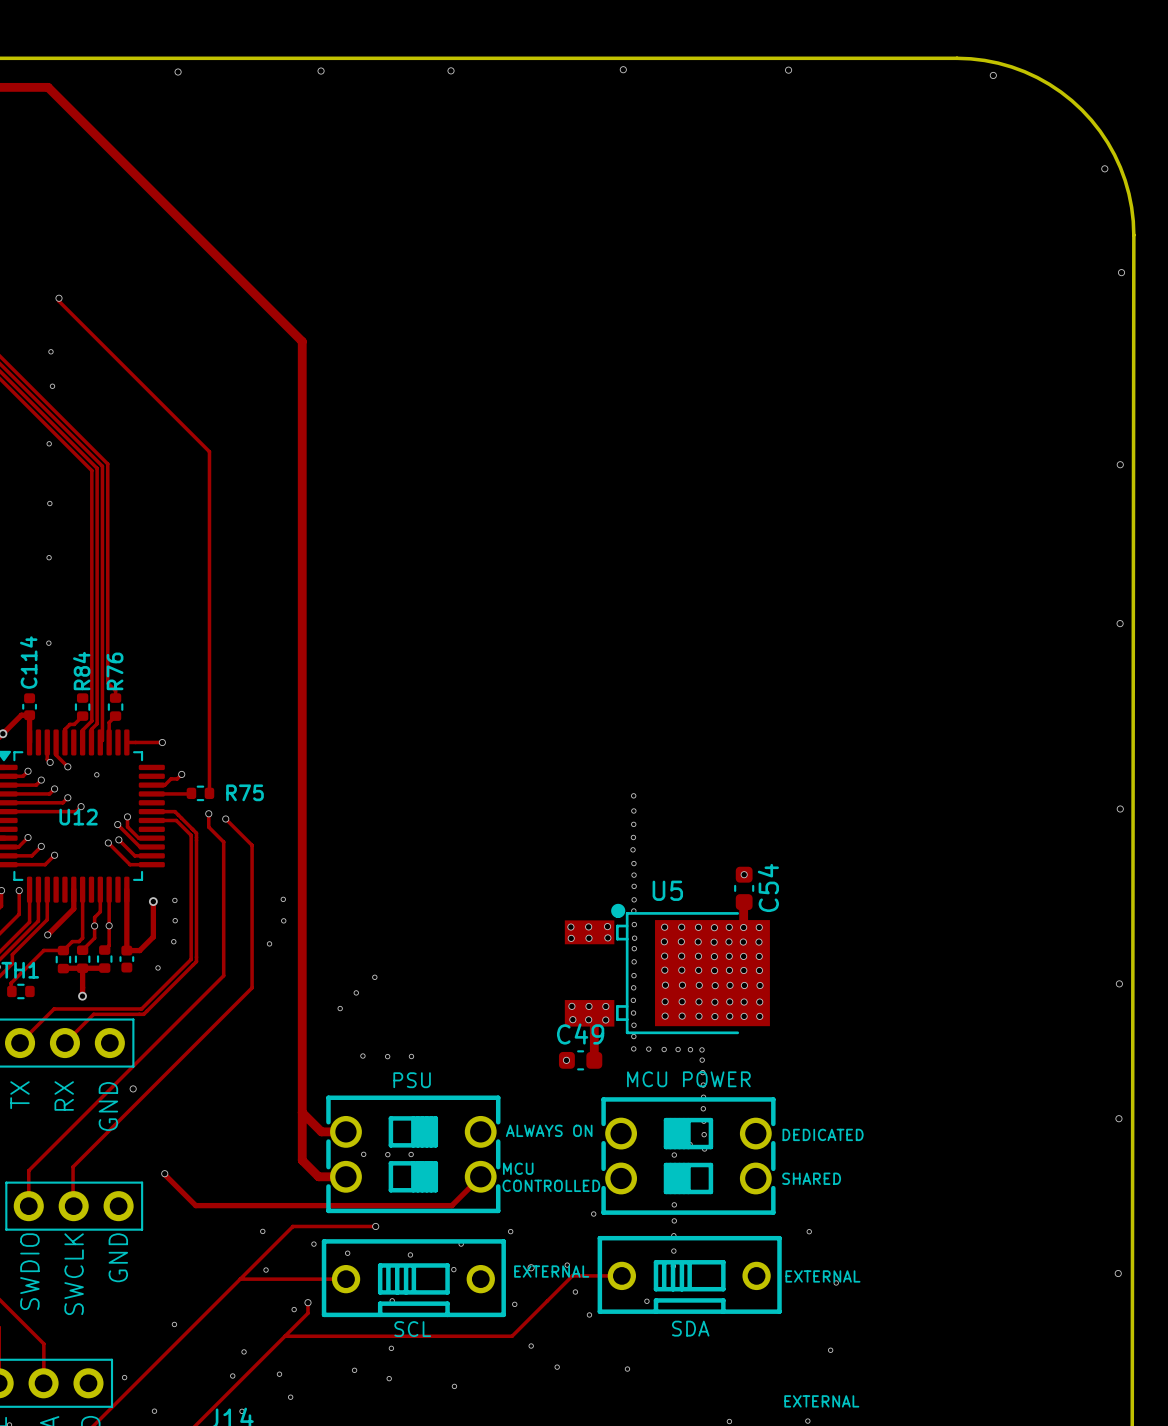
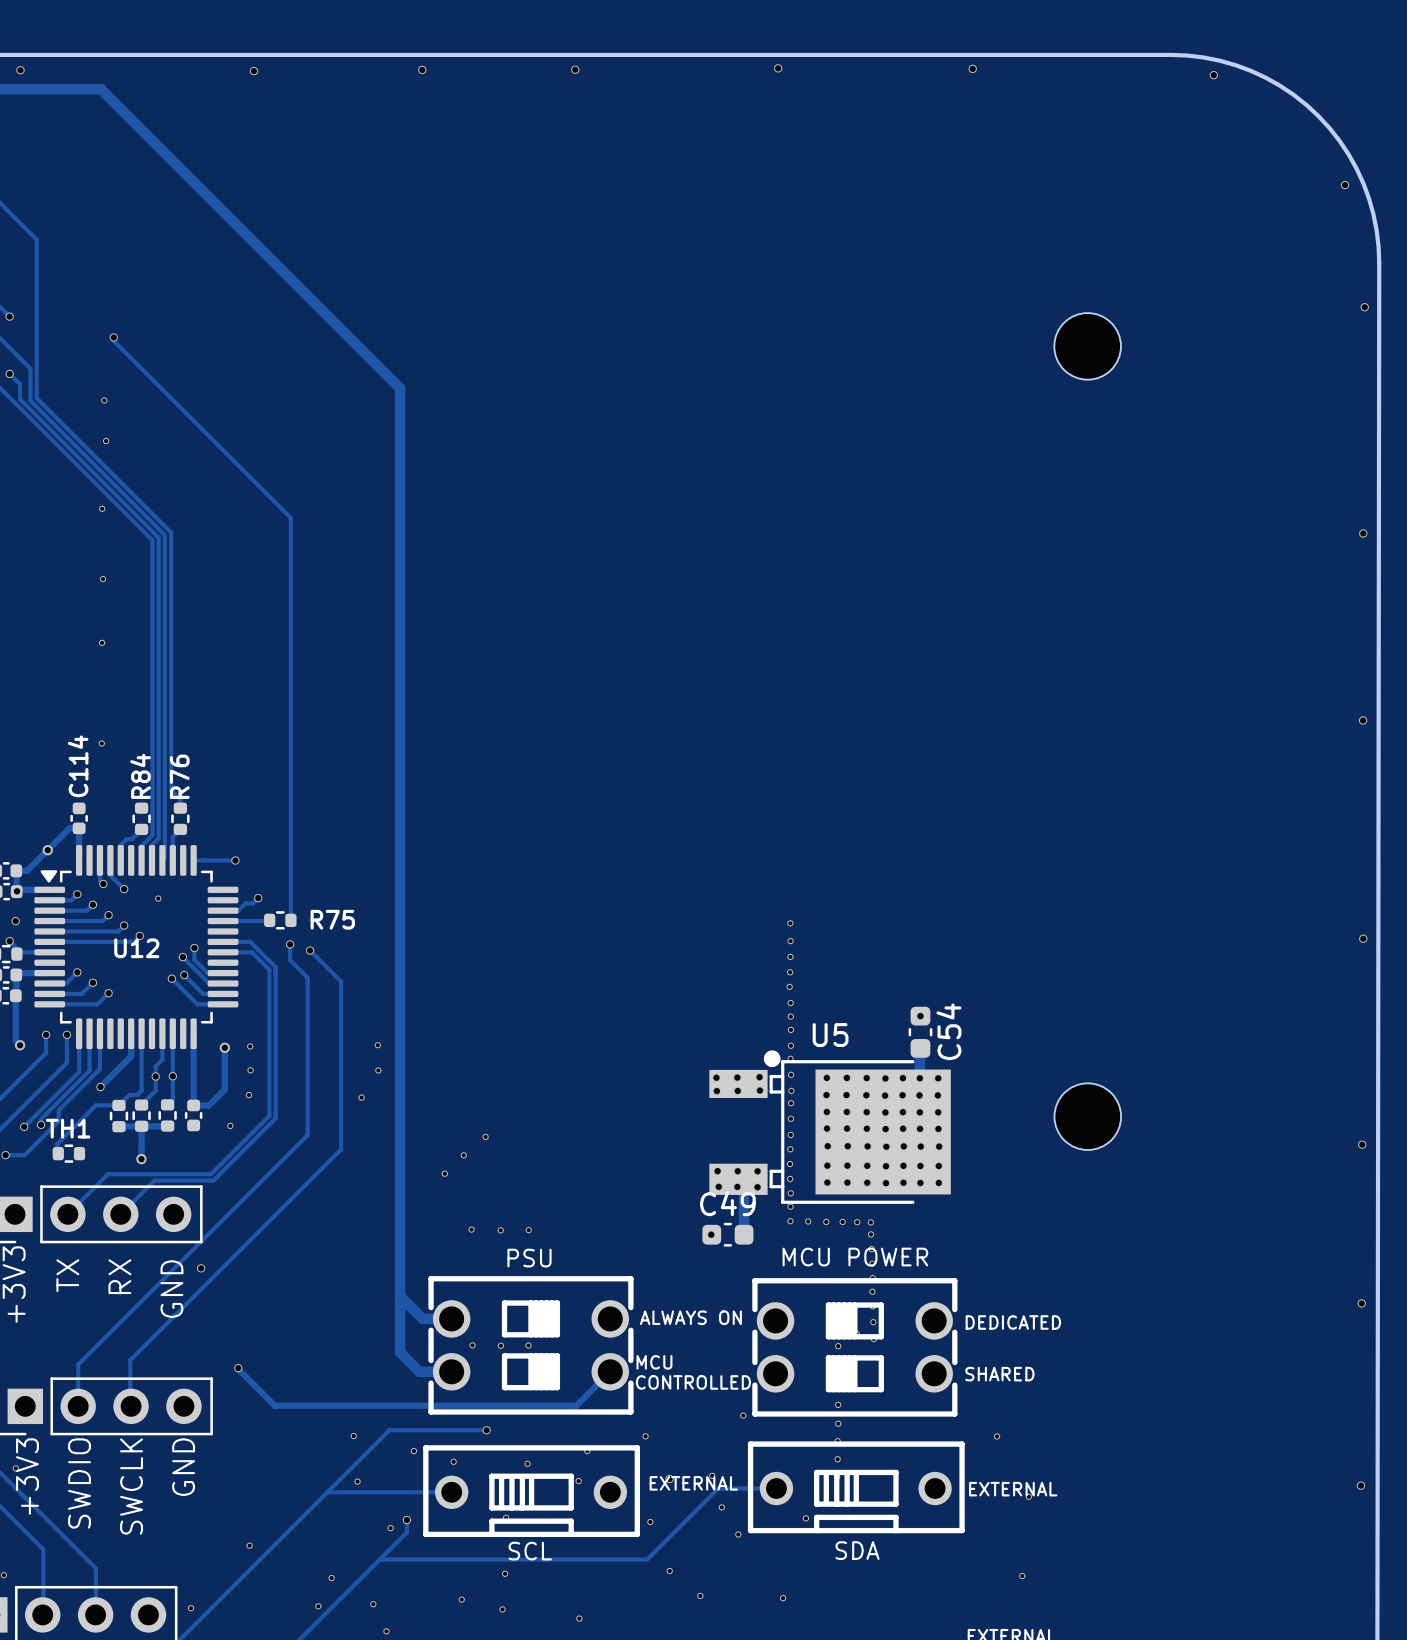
part: none -> (1087, 346)
part: none -> (1087, 1116)

